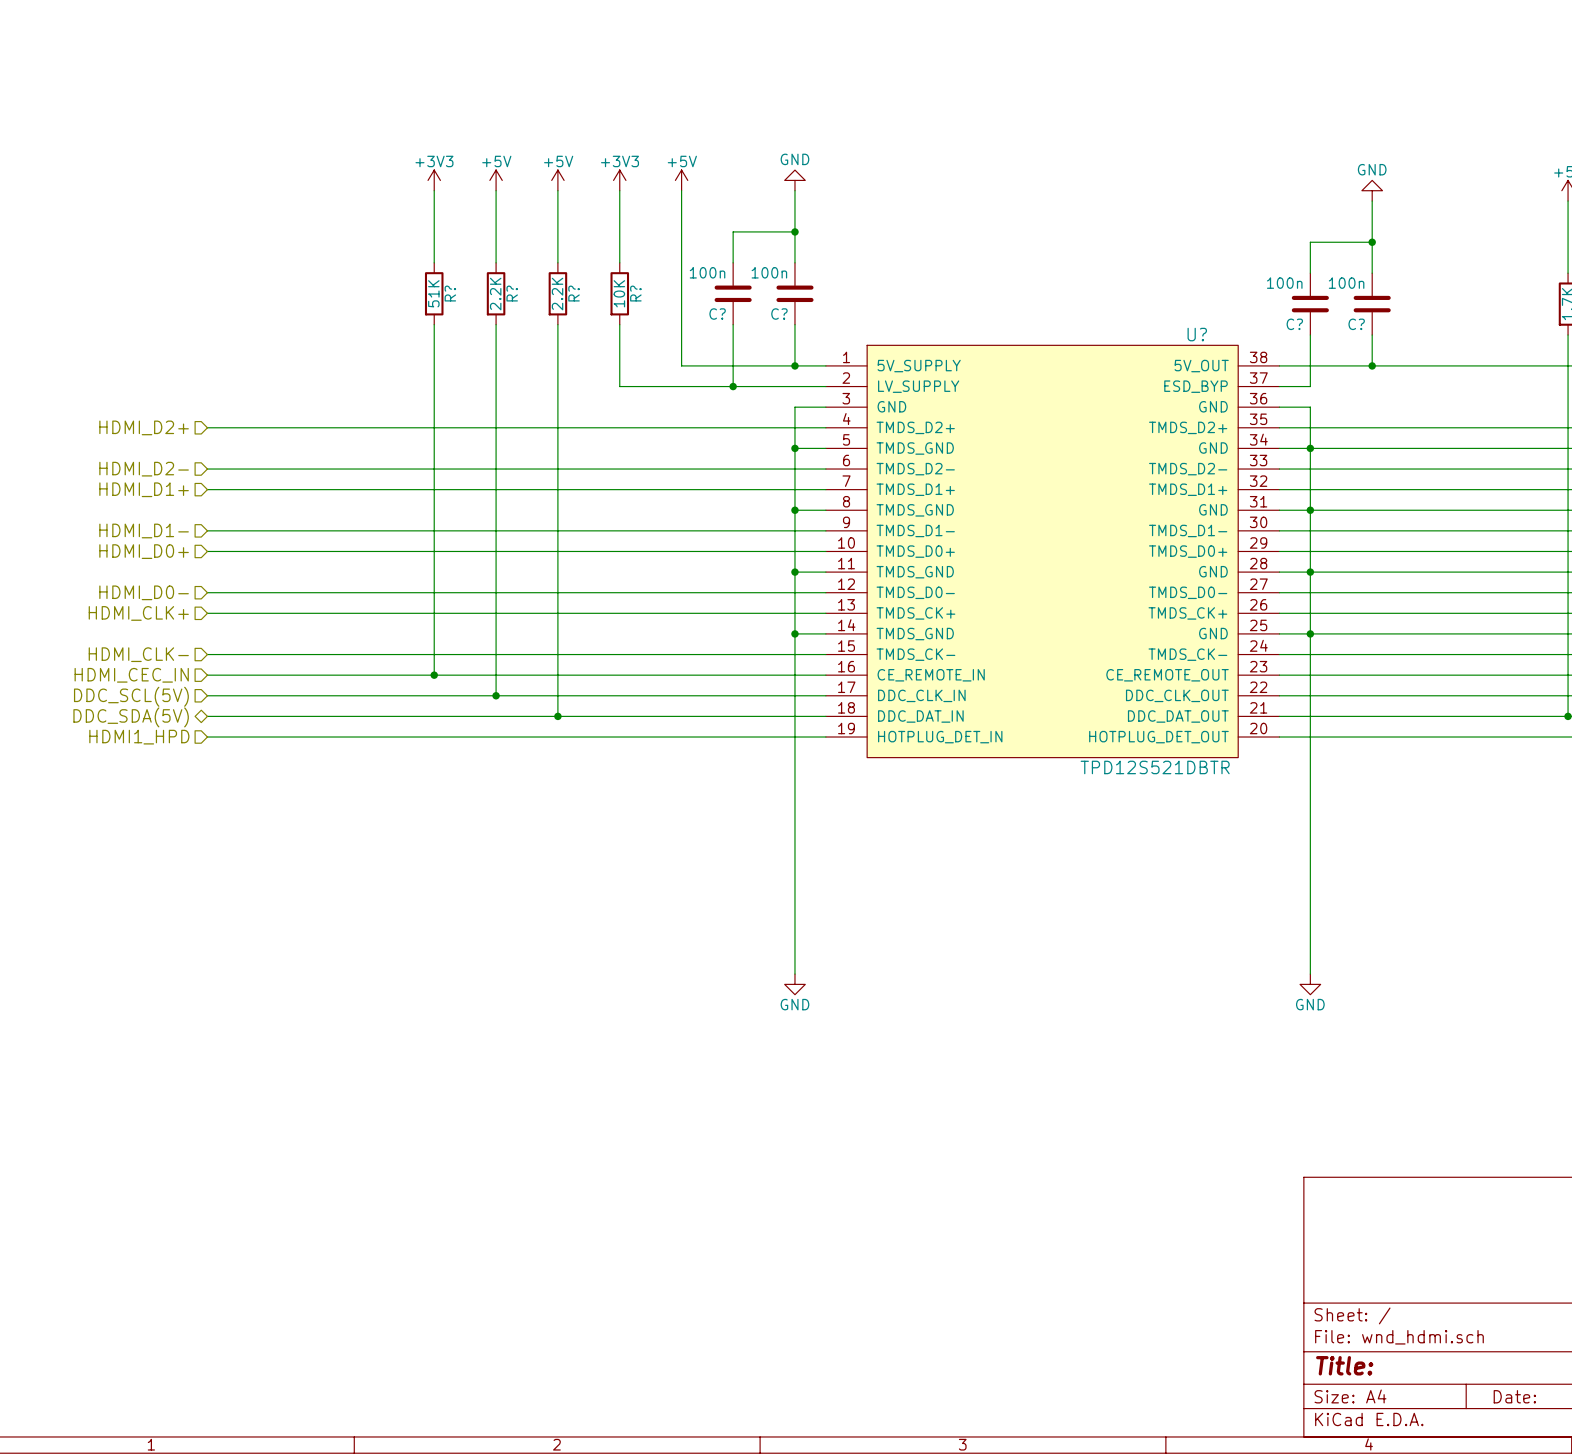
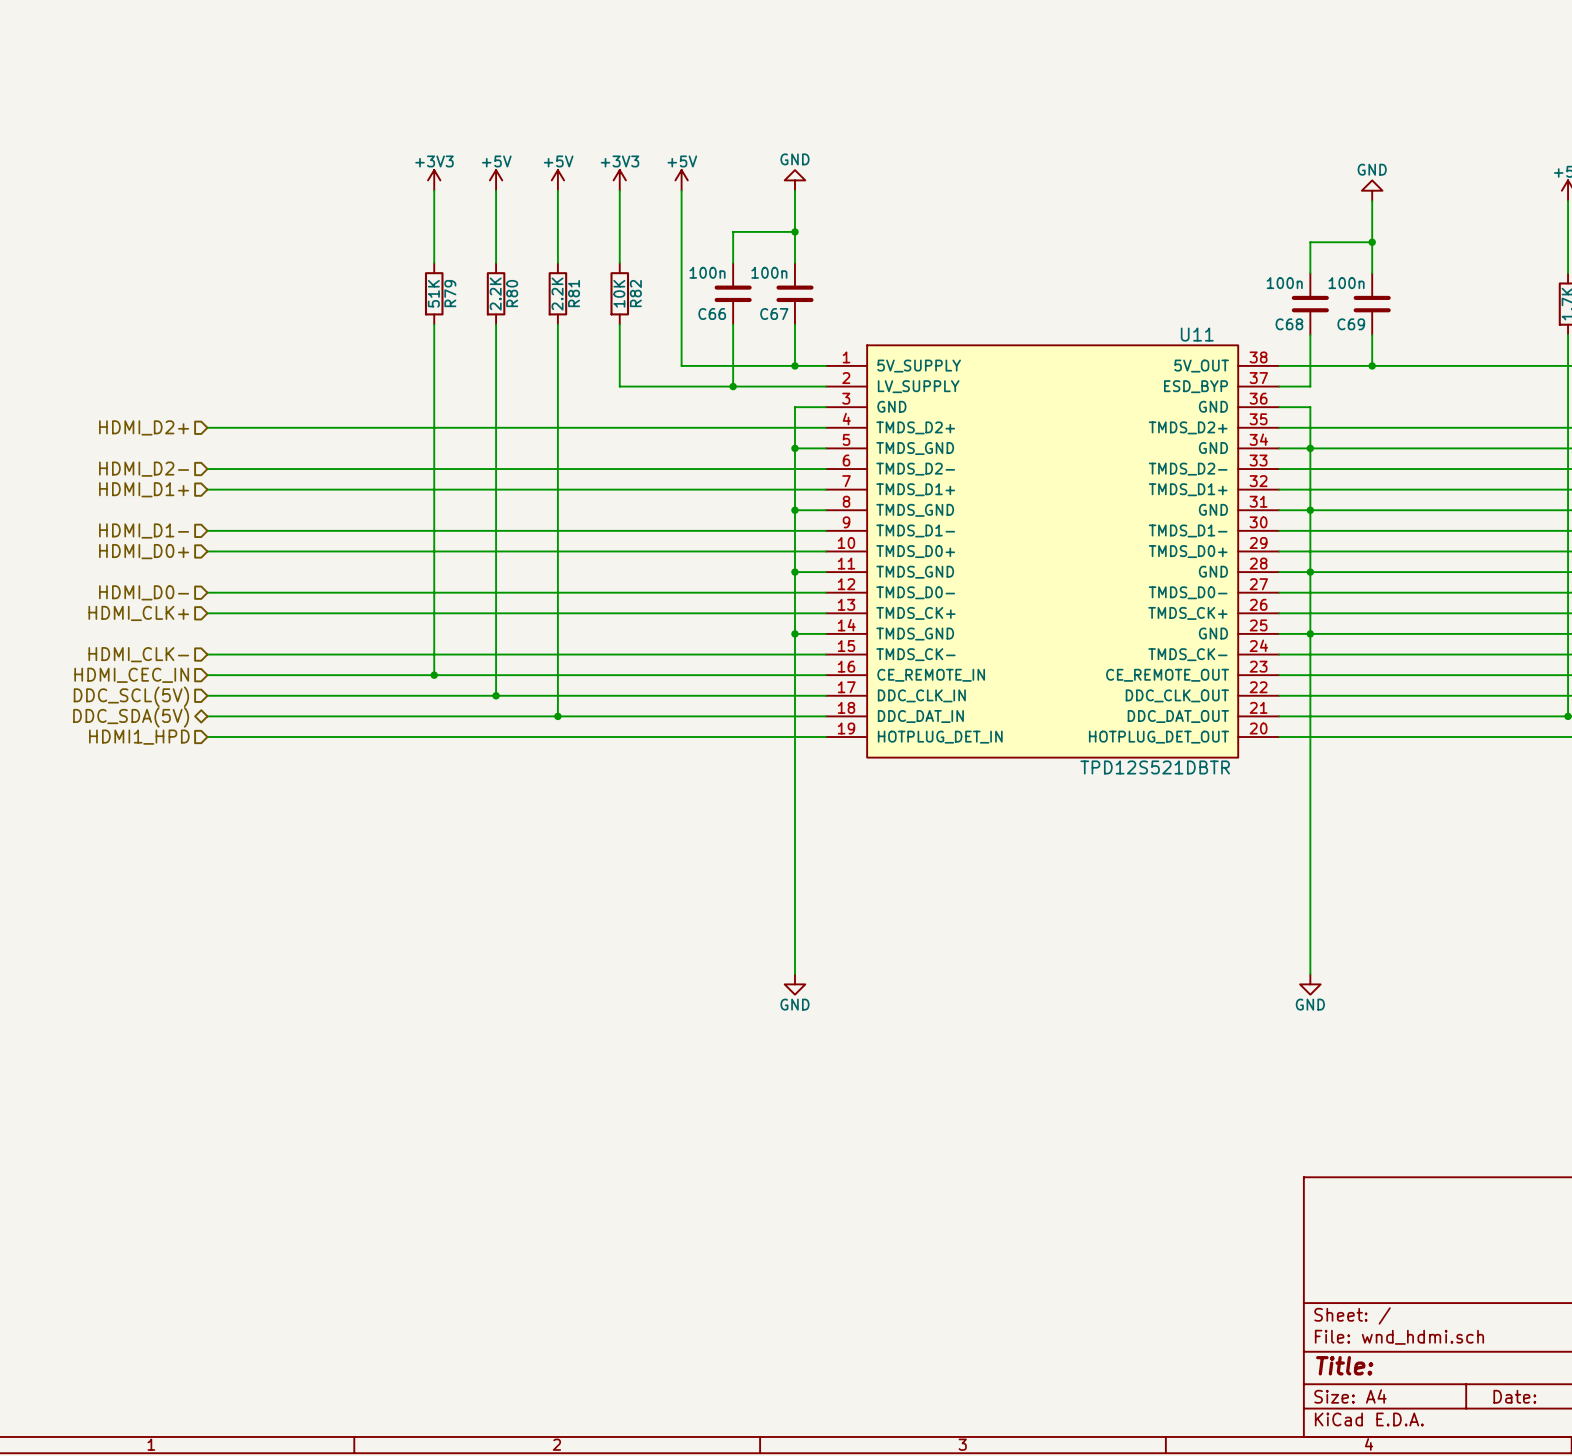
R? name: R? (450, 293) -> R79 (450, 293)
R? name: R? (512, 293) -> R80 (512, 293)
R? name: R? (574, 293) -> R81 (574, 293)
R? name: R? (635, 293) -> R82 (635, 293)
C? name: C? (717, 314) -> C66 (712, 314)
C? name: C? (779, 314) -> C67 (774, 314)
C? name: C? (1294, 324) -> C68 (1289, 324)
C? name: C? (1356, 324) -> C69 (1351, 324)
U? name: U? (1197, 334) -> U11 (1197, 334)

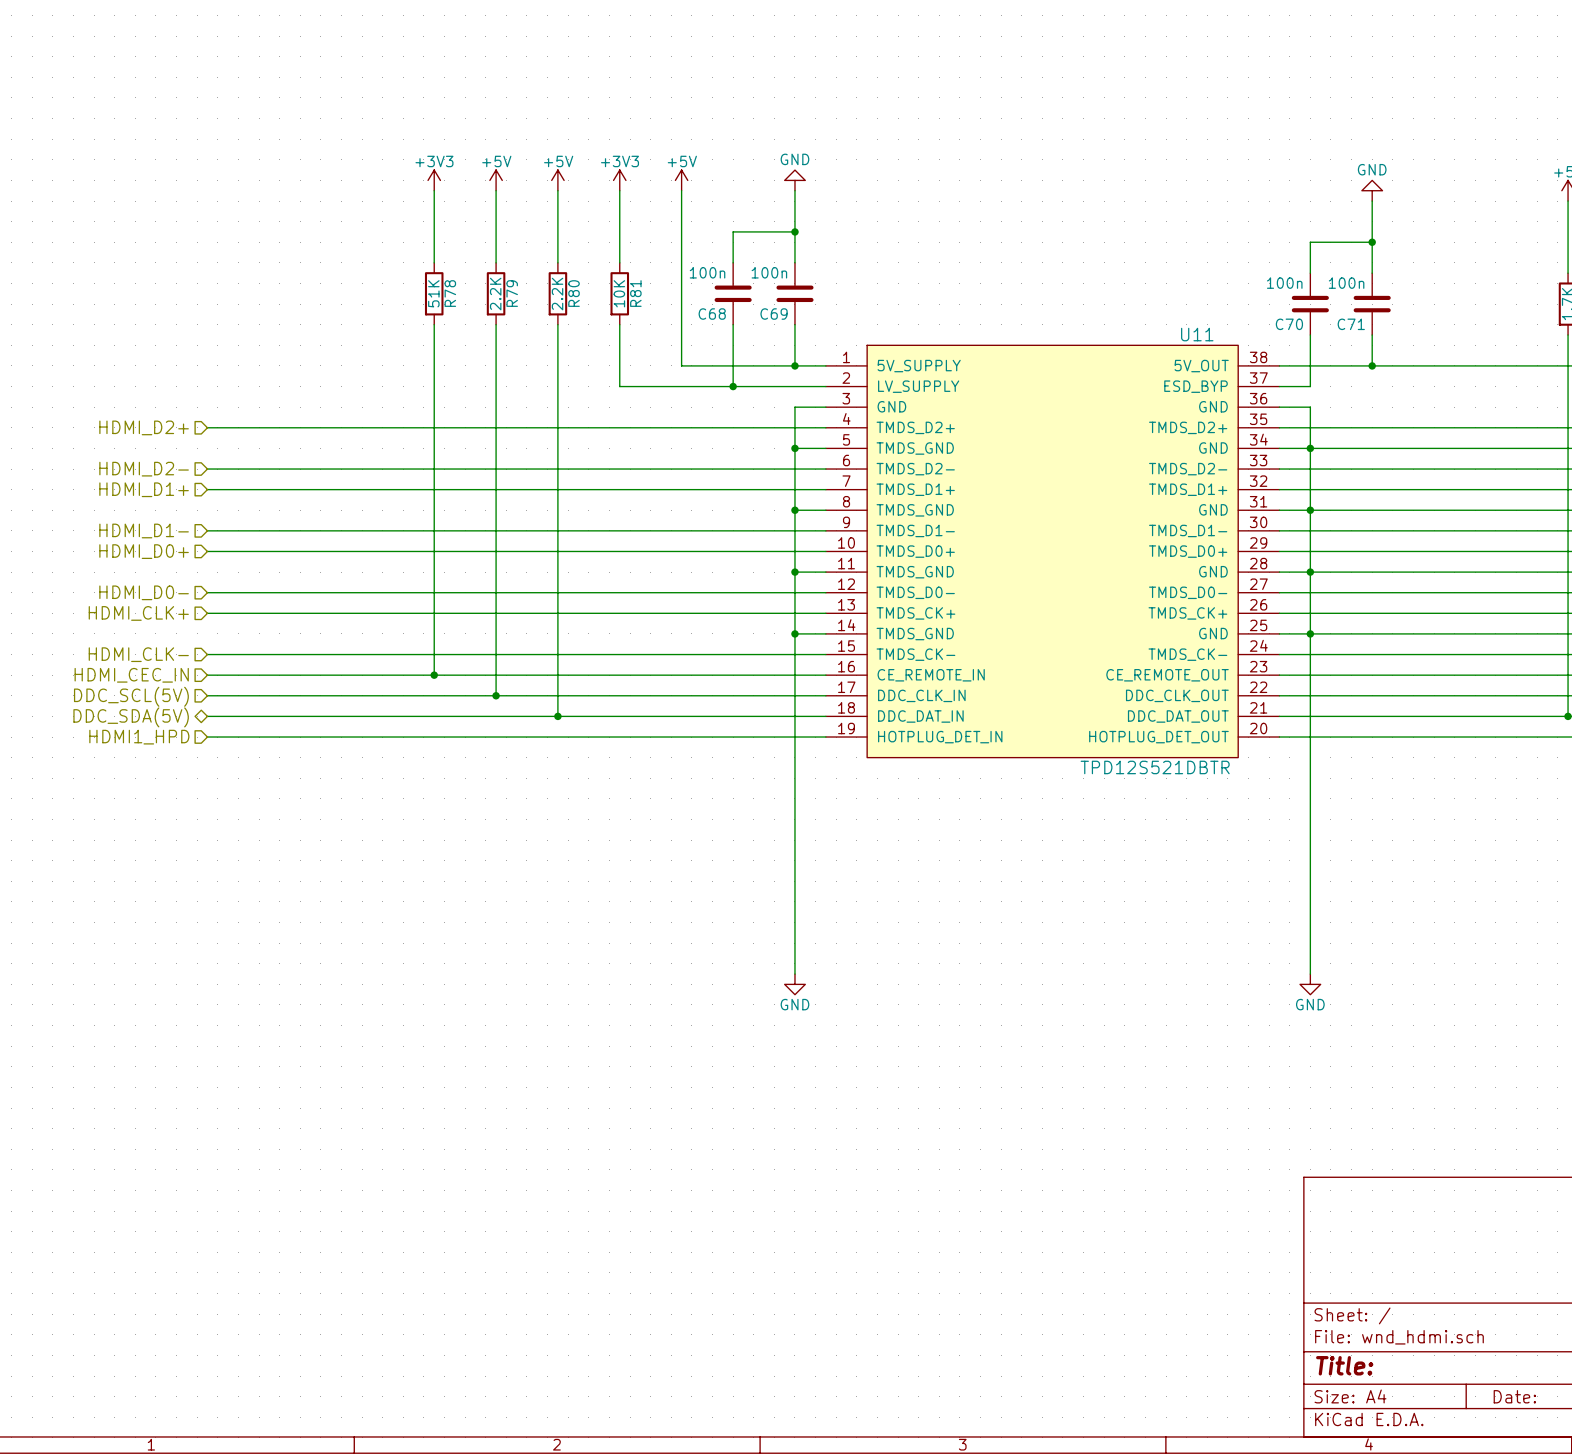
R79 name: R79 (450, 293) -> R78 (450, 293)
R80 name: R80 (512, 293) -> R79 (512, 293)
R81 name: R81 (574, 293) -> R80 (574, 293)
R82 name: R82 (635, 293) -> R81 (635, 293)
C66 name: C66 (712, 314) -> C68 (712, 314)
C67 name: C67 (774, 314) -> C69 (774, 314)
C68 name: C68 (1289, 324) -> C70 (1289, 324)
C69 name: C69 (1351, 324) -> C71 (1351, 324)

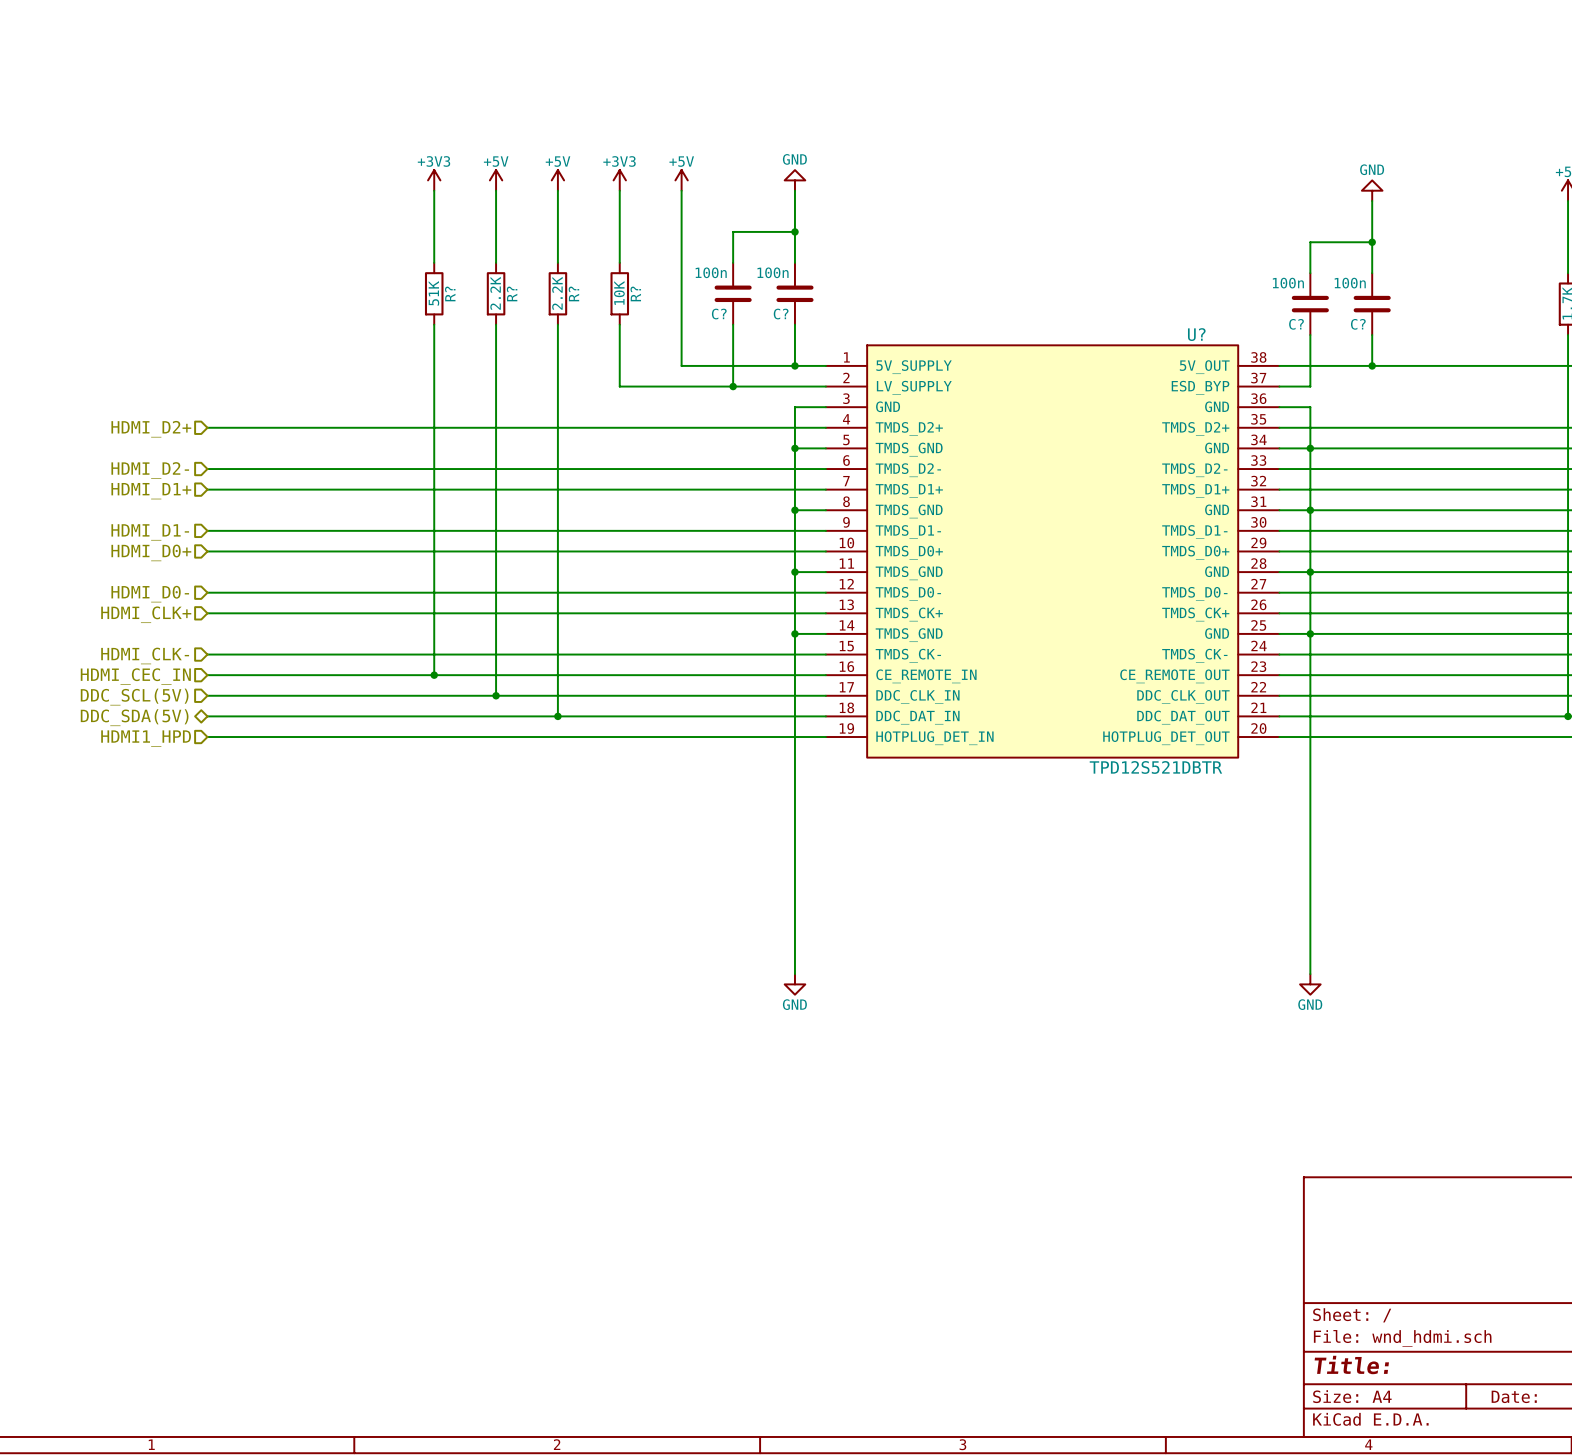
R78 name: R78 (450, 293) -> R? (450, 293)
R79 name: R79 (512, 293) -> R? (512, 293)
R80 name: R80 (574, 293) -> R? (573, 293)
R81 name: R81 (635, 293) -> R? (635, 293)
C68 name: C68 (712, 314) -> C? (719, 314)
C69 name: C69 (774, 314) -> C? (781, 314)
C70 name: C70 (1289, 324) -> C? (1296, 324)
C71 name: C71 (1351, 324) -> C? (1358, 324)
U11 name: U11 (1197, 334) -> U? (1196, 334)

